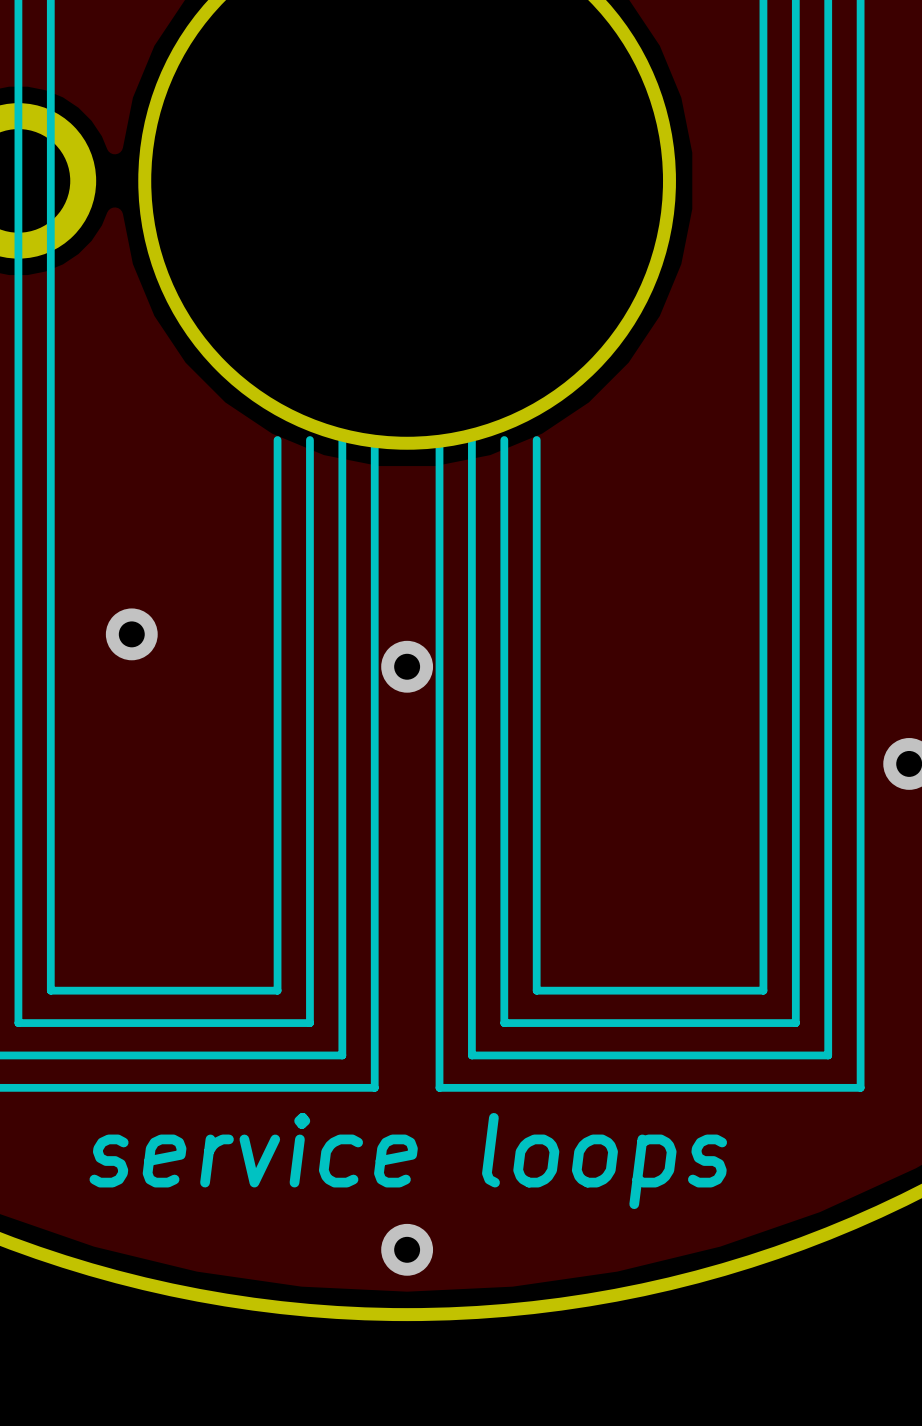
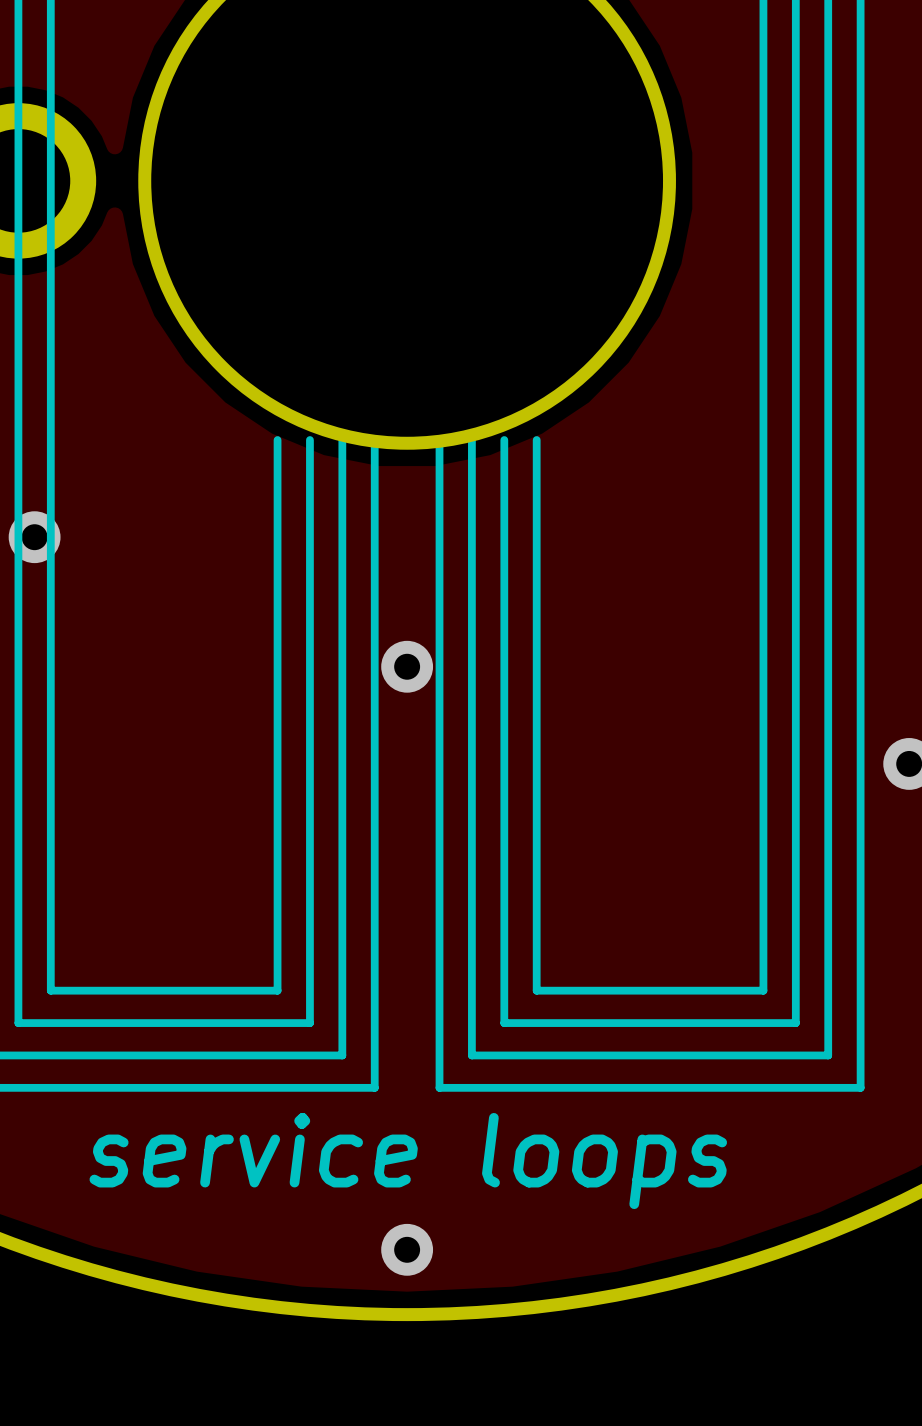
via: none -> (34, 537)
via: (131, 634) -> none

